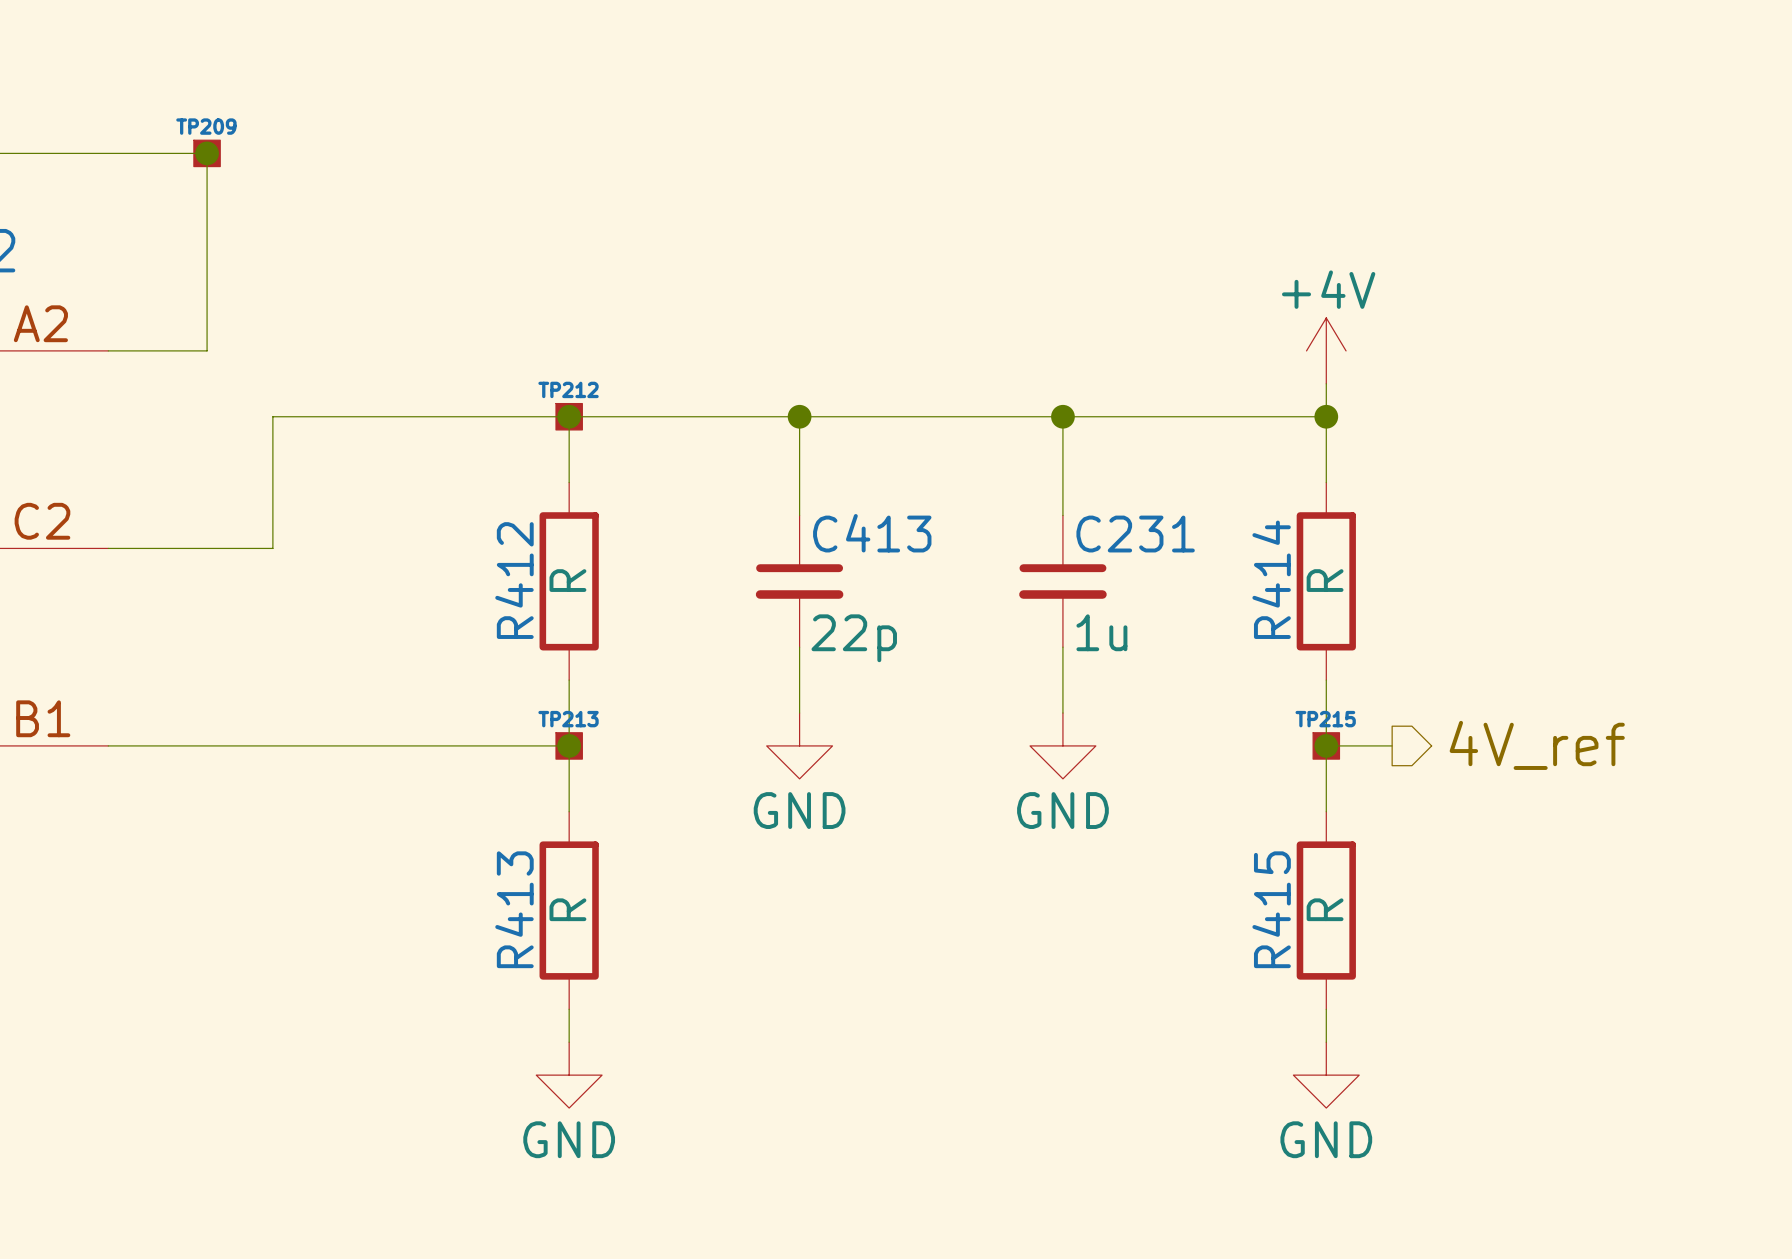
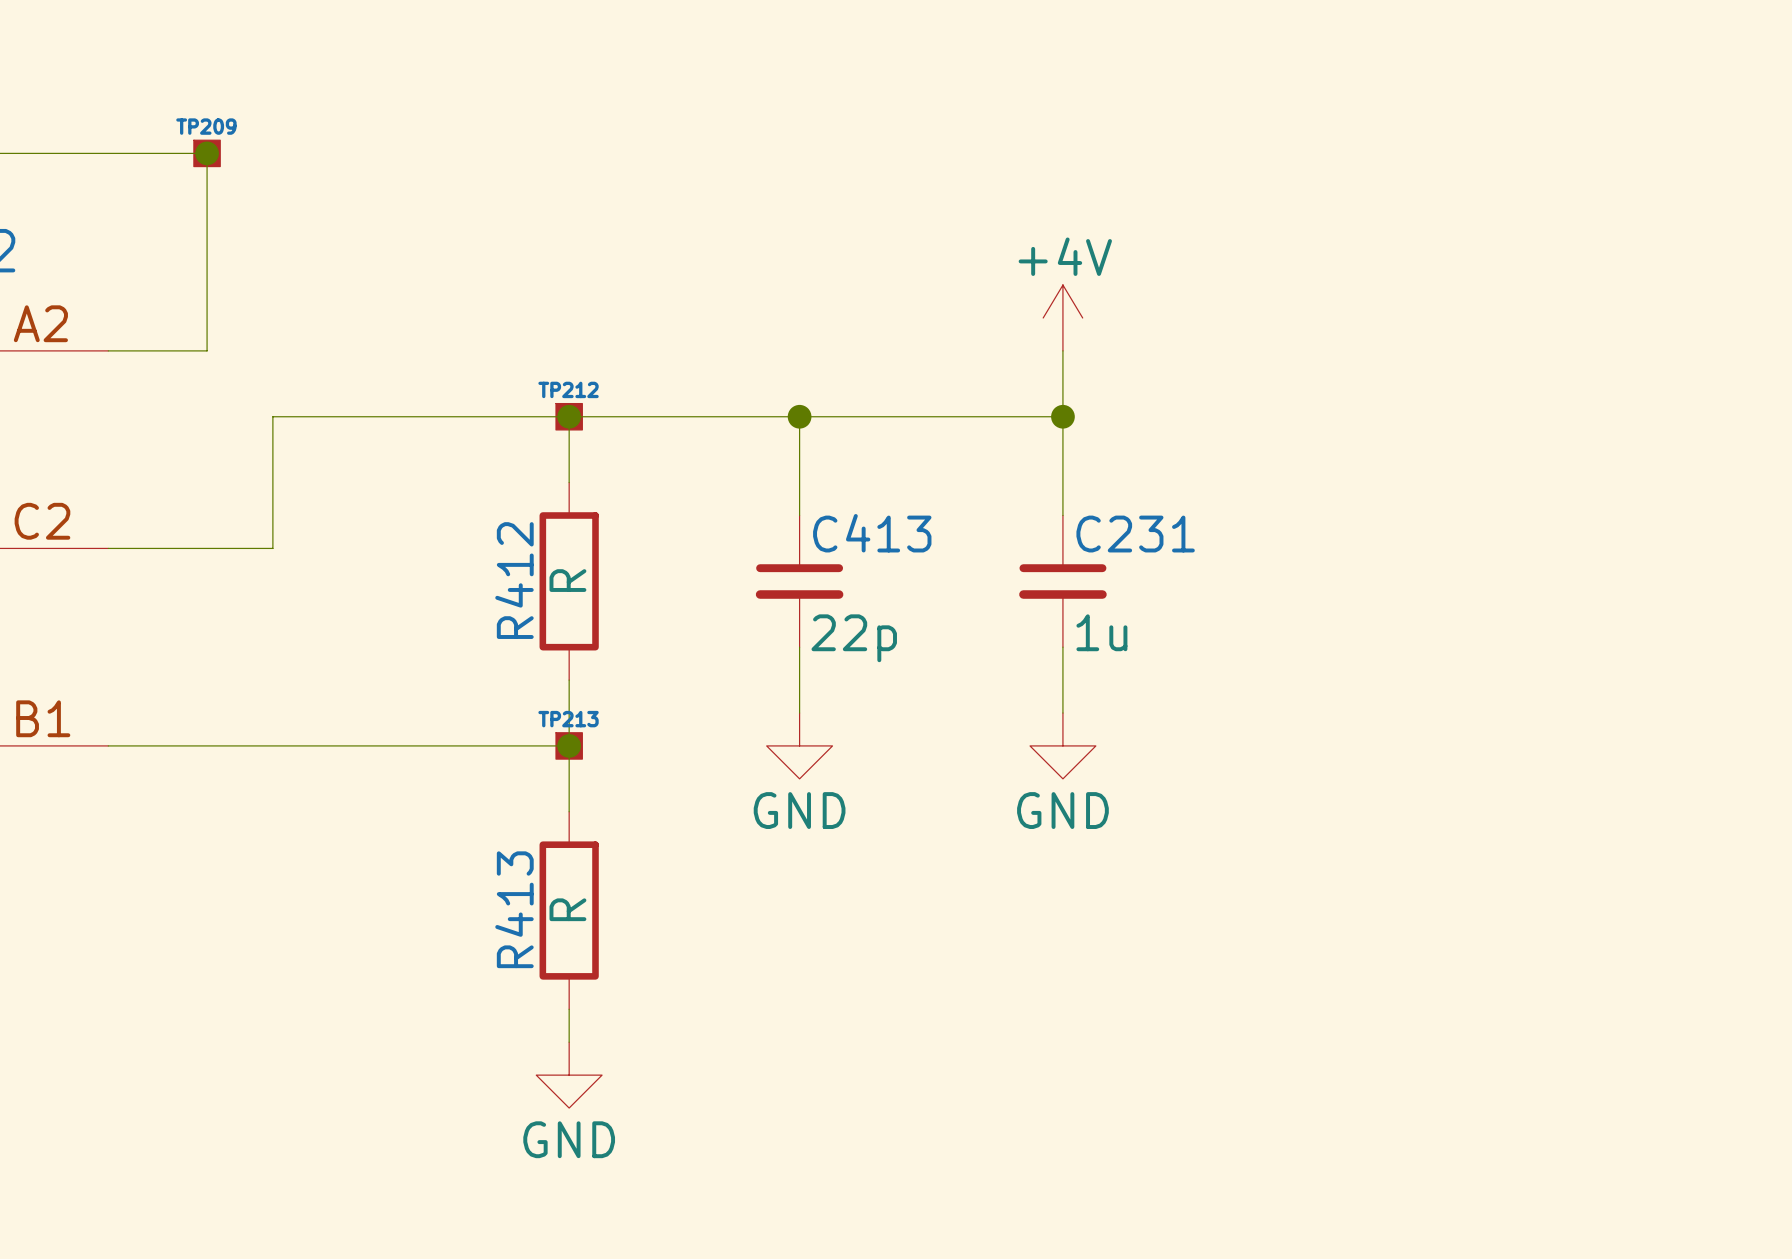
power symbol position: +4V (1326, 350) -> +4V (1062, 317)
wire: (1326, 383) (1326, 482) -> none
wire: (1062, 416) (1326, 416) -> (1062, 416) (1062, 350)
junction: (1326, 416) -> none
R414: R (1326, 581) -> none
wire: (1326, 680) (1326, 811) -> none
wire: (1326, 745) (1392, 745) -> none
TP215: (1326, 745) -> none
junction: (1326, 745) -> none
hierarchical label: 4V_ref (1537, 745) -> none
R415: R (1326, 910) -> none
wire: (1326, 1009) (1326, 1042) -> none
power symbol: GND (1326, 1075) -> none

